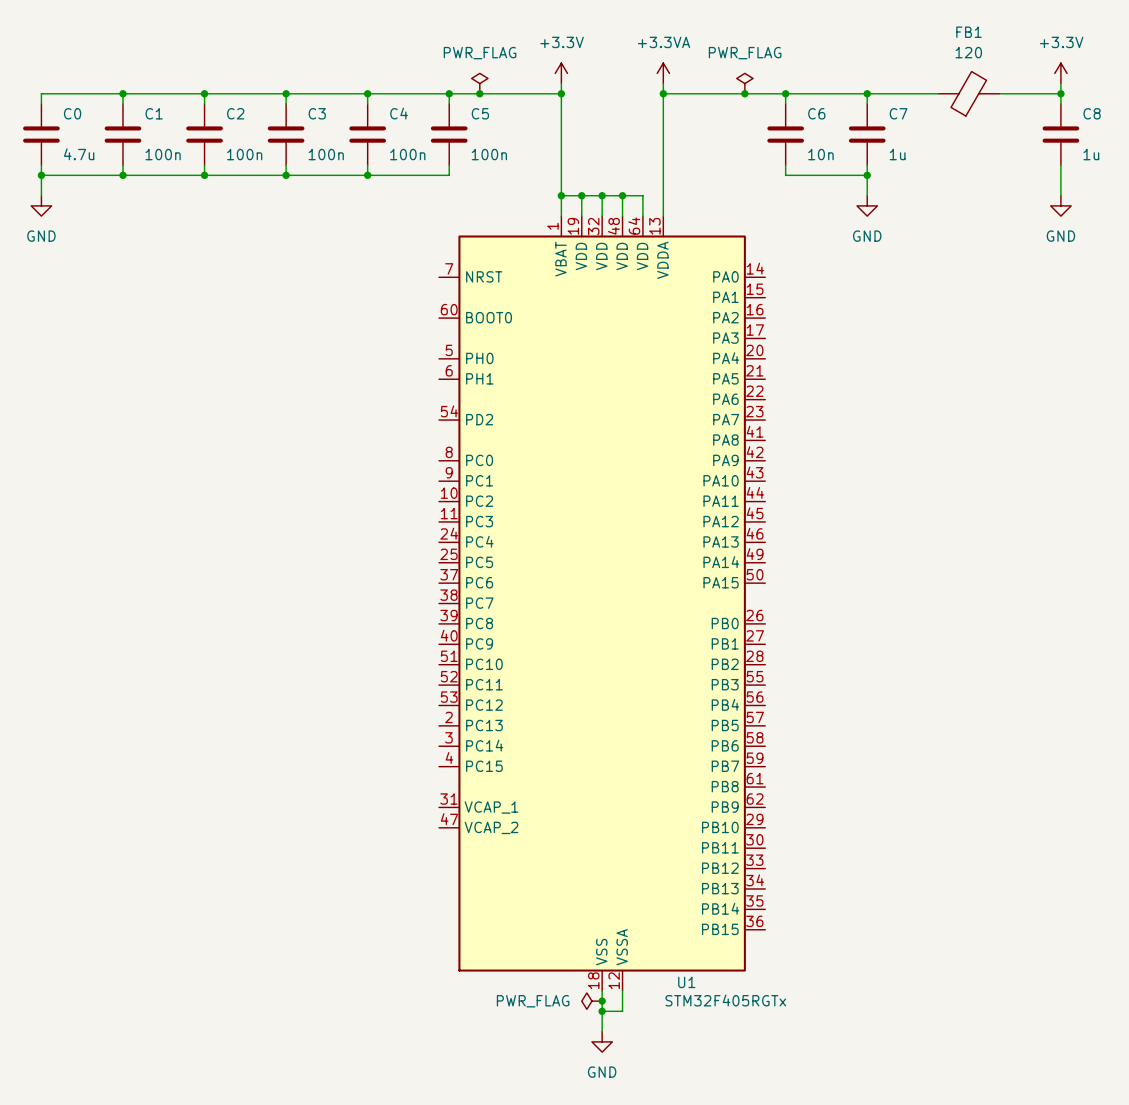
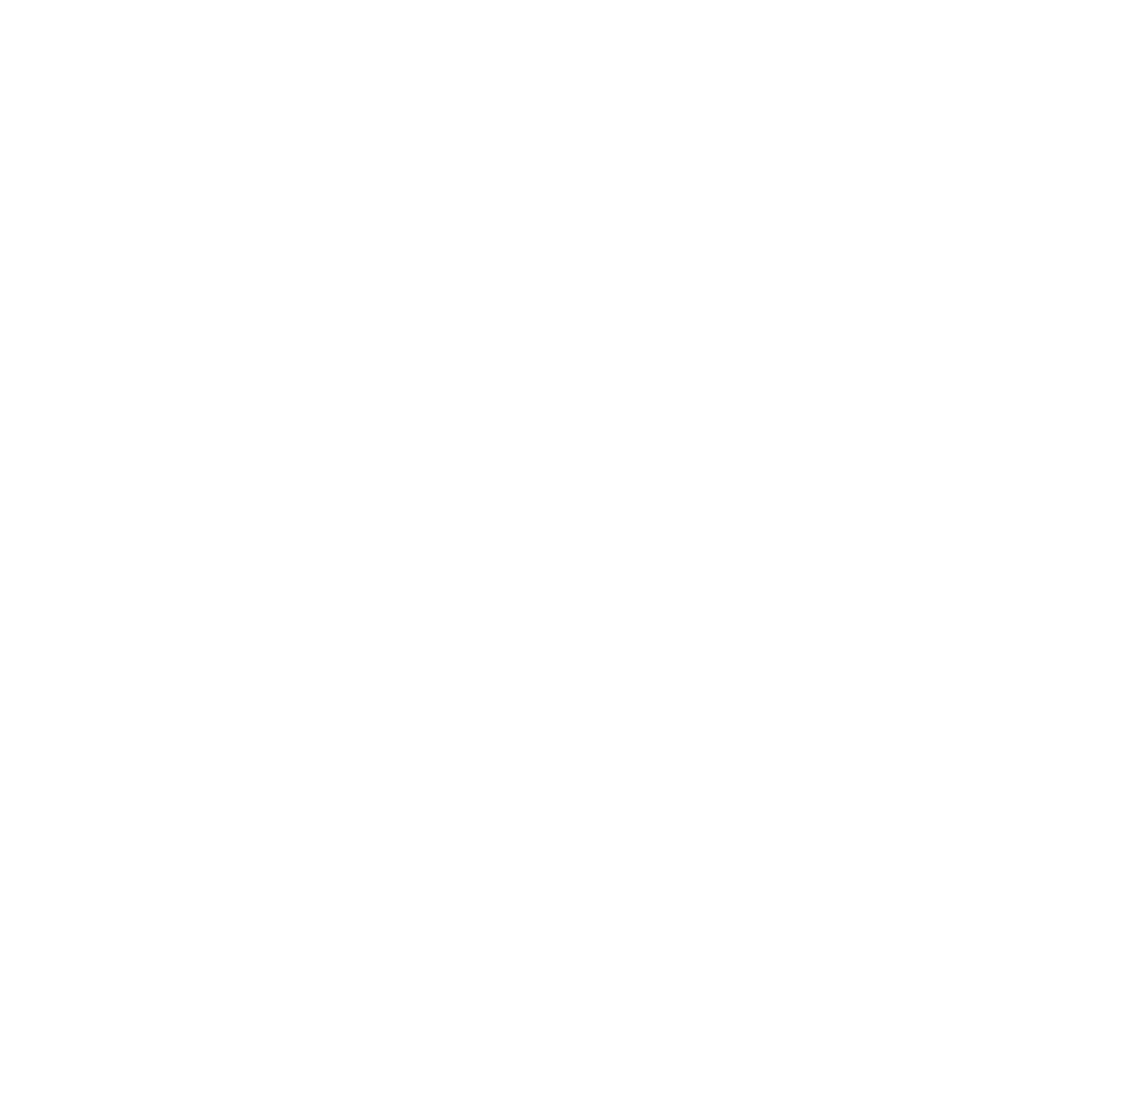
power symbol: +3.3V (561, 73) -> none
power symbol: +3.3VA (663, 73) -> none
power symbol: +3.3V (1060, 73) -> none
power symbol: PWR_FLAG (479, 83) -> none
wire: (561, 83) (561, 216) -> none
wire: (663, 83) (663, 216) -> none
power symbol: PWR_FLAG (744, 83) -> none
wire: (1060, 83) (1060, 103) -> none
wire: (122, 93) (122, 103) -> none
junction: (122, 93) -> none
wire: (204, 93) (204, 103) -> none
junction: (204, 93) -> none
wire: (286, 93) (286, 103) -> none
junction: (286, 93) -> none
wire: (367, 93) (367, 103) -> none
junction: (367, 93) -> none
wire: (449, 93) (449, 103) -> none
junction: (449, 93) -> none
junction: (479, 93) -> none
wire: (561, 93) (41, 93) (41, 103) -> none
junction: (561, 93) -> none
wire: (663, 93) (938, 93) -> none
junction: (663, 93) -> none
junction: (744, 93) -> none
wire: (785, 93) (785, 103) -> none
junction: (785, 93) -> none
wire: (867, 93) (867, 103) -> none
junction: (867, 93) -> none
FB1: 120 (969, 93) -> none
wire: (999, 93) (1060, 93) -> none
junction: (1060, 93) -> none
C0: 4.7u (41, 134) -> none
C1: 100n (122, 134) -> none
C2: 100n (204, 134) -> none
C3: 100n (286, 134) -> none
C4: 100n (367, 134) -> none
C5: 100n (449, 134) -> none
C6: 10n (785, 134) -> none
C7: 1u (867, 134) -> none
C8: 1u (1060, 134) -> none
wire: (41, 165) (41, 195) -> none
wire: (122, 165) (122, 175) -> none
wire: (204, 165) (204, 175) -> none
wire: (286, 165) (286, 175) -> none
wire: (367, 165) (367, 175) -> none
wire: (449, 165) (449, 175) (41, 175) -> none
wire: (785, 165) (785, 175) (867, 175) -> none
wire: (867, 165) (867, 195) -> none
wire: (1060, 165) (1060, 195) -> none
junction: (41, 175) -> none
junction: (122, 175) -> none
junction: (204, 175) -> none
junction: (286, 175) -> none
junction: (367, 175) -> none
junction: (867, 175) -> none
wire: (561, 195) (642, 195) (642, 216) -> none
junction: (561, 195) -> none
wire: (581, 195) (581, 216) -> none
junction: (581, 195) -> none
wire: (602, 195) (602, 216) -> none
junction: (602, 195) -> none
wire: (622, 195) (622, 216) -> none
junction: (622, 195) -> none
power symbol: GND (41, 205) -> none
power symbol: GND (867, 205) -> none
power symbol: GND (1060, 205) -> none
U1: STM32F405RGTx (602, 603) -> none
wire: (602, 990) (602, 1031) -> none
wire: (622, 990) (622, 1011) (602, 1011) -> none
power symbol: PWR_FLAG (591, 1001) -> none
junction: (602, 1001) -> none
junction: (602, 1011) -> none
power symbol: GND (602, 1041) -> none

